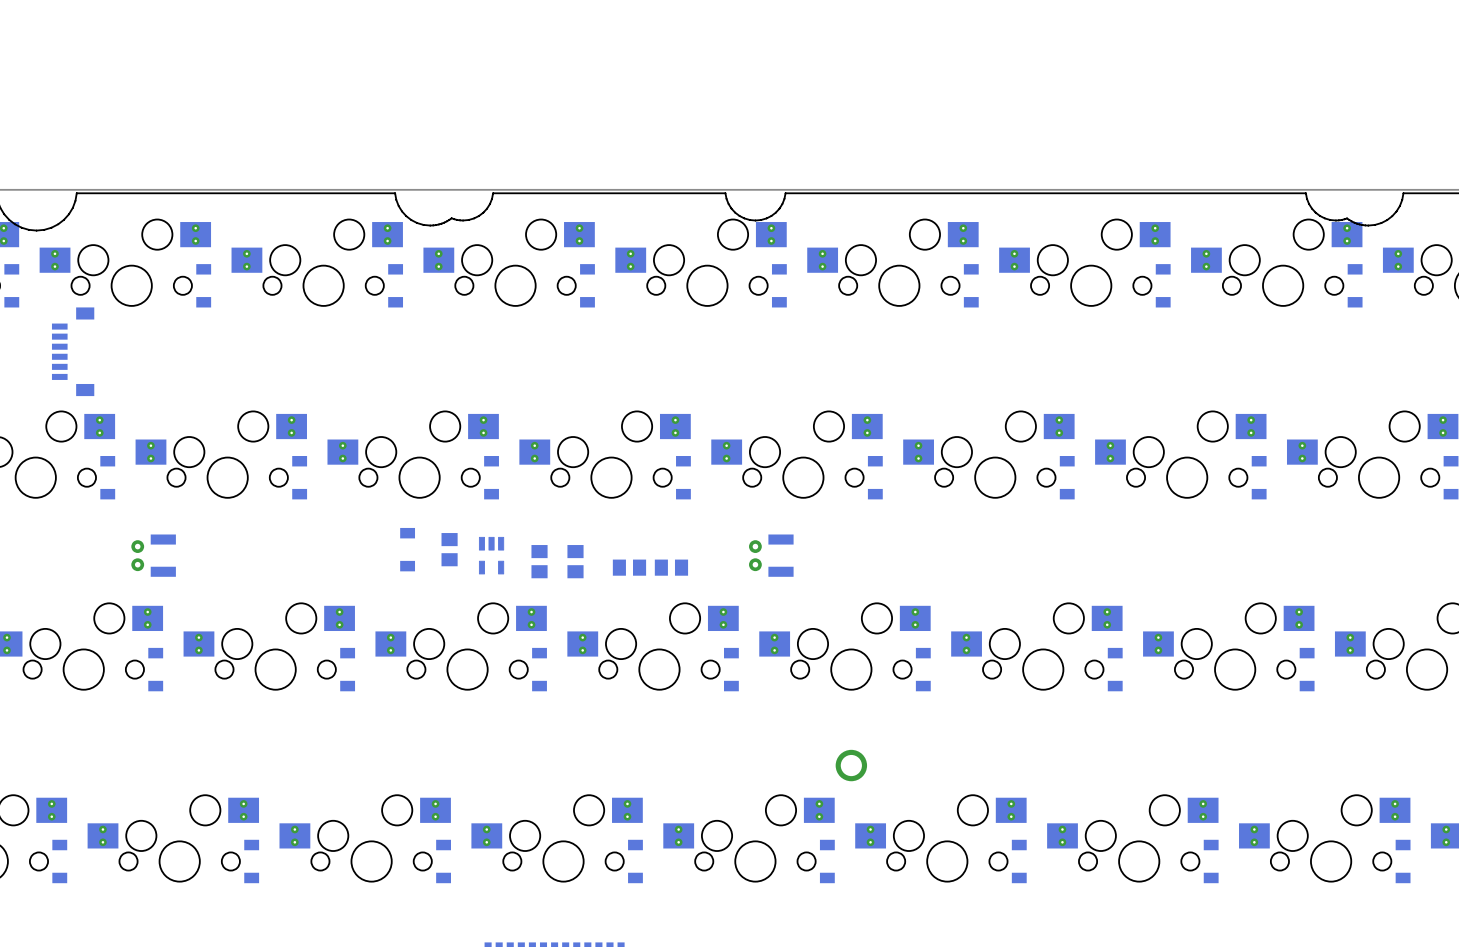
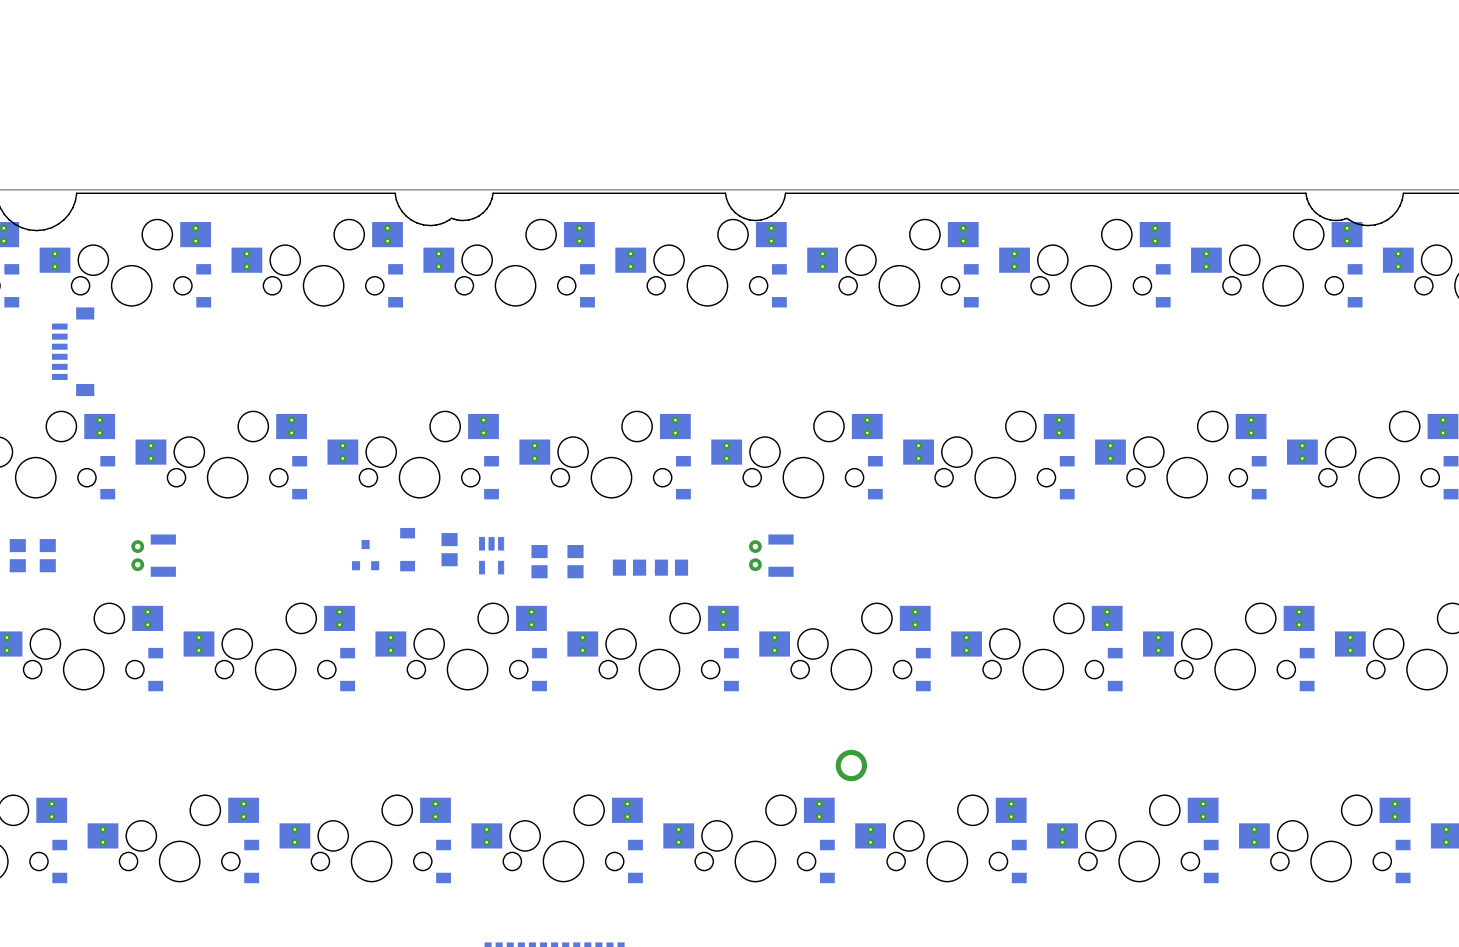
part: none -> (17, 555)
part: none -> (47, 555)
part: none -> (365, 555)

